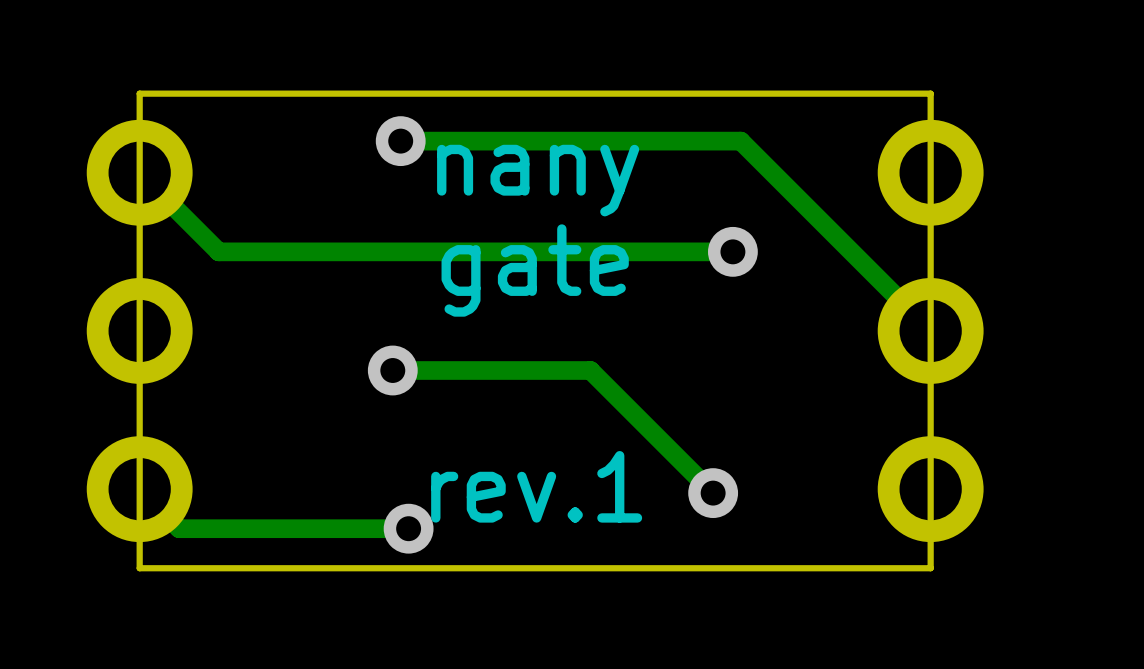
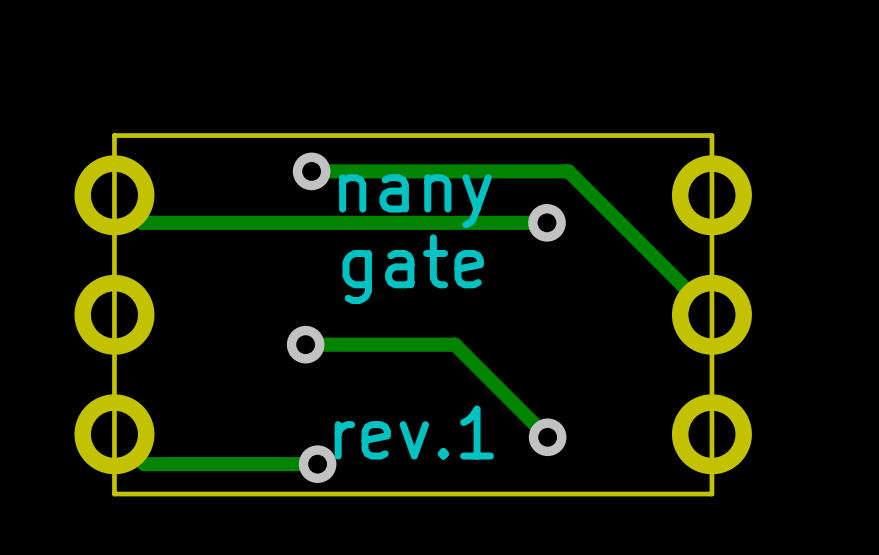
track: (176, 209) (218, 251) (732, 251) -> (141, 222) (546, 222)
via position: (732, 251) -> (546, 222)

